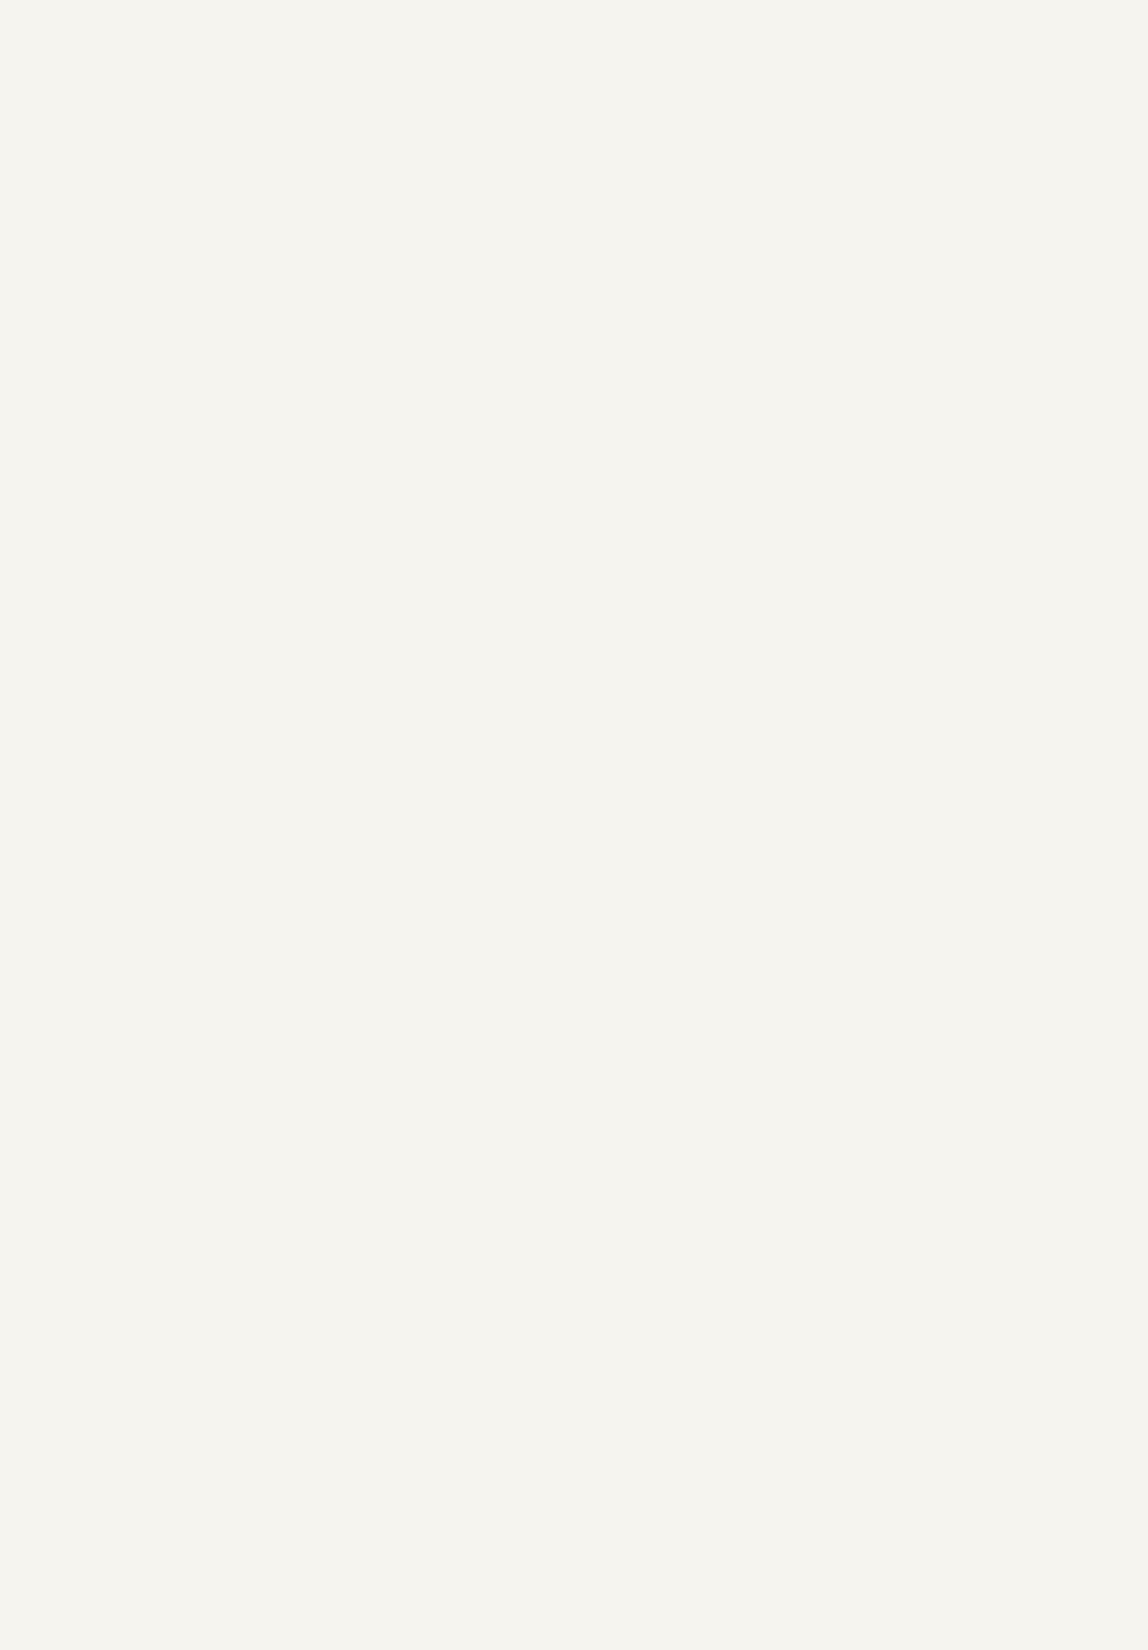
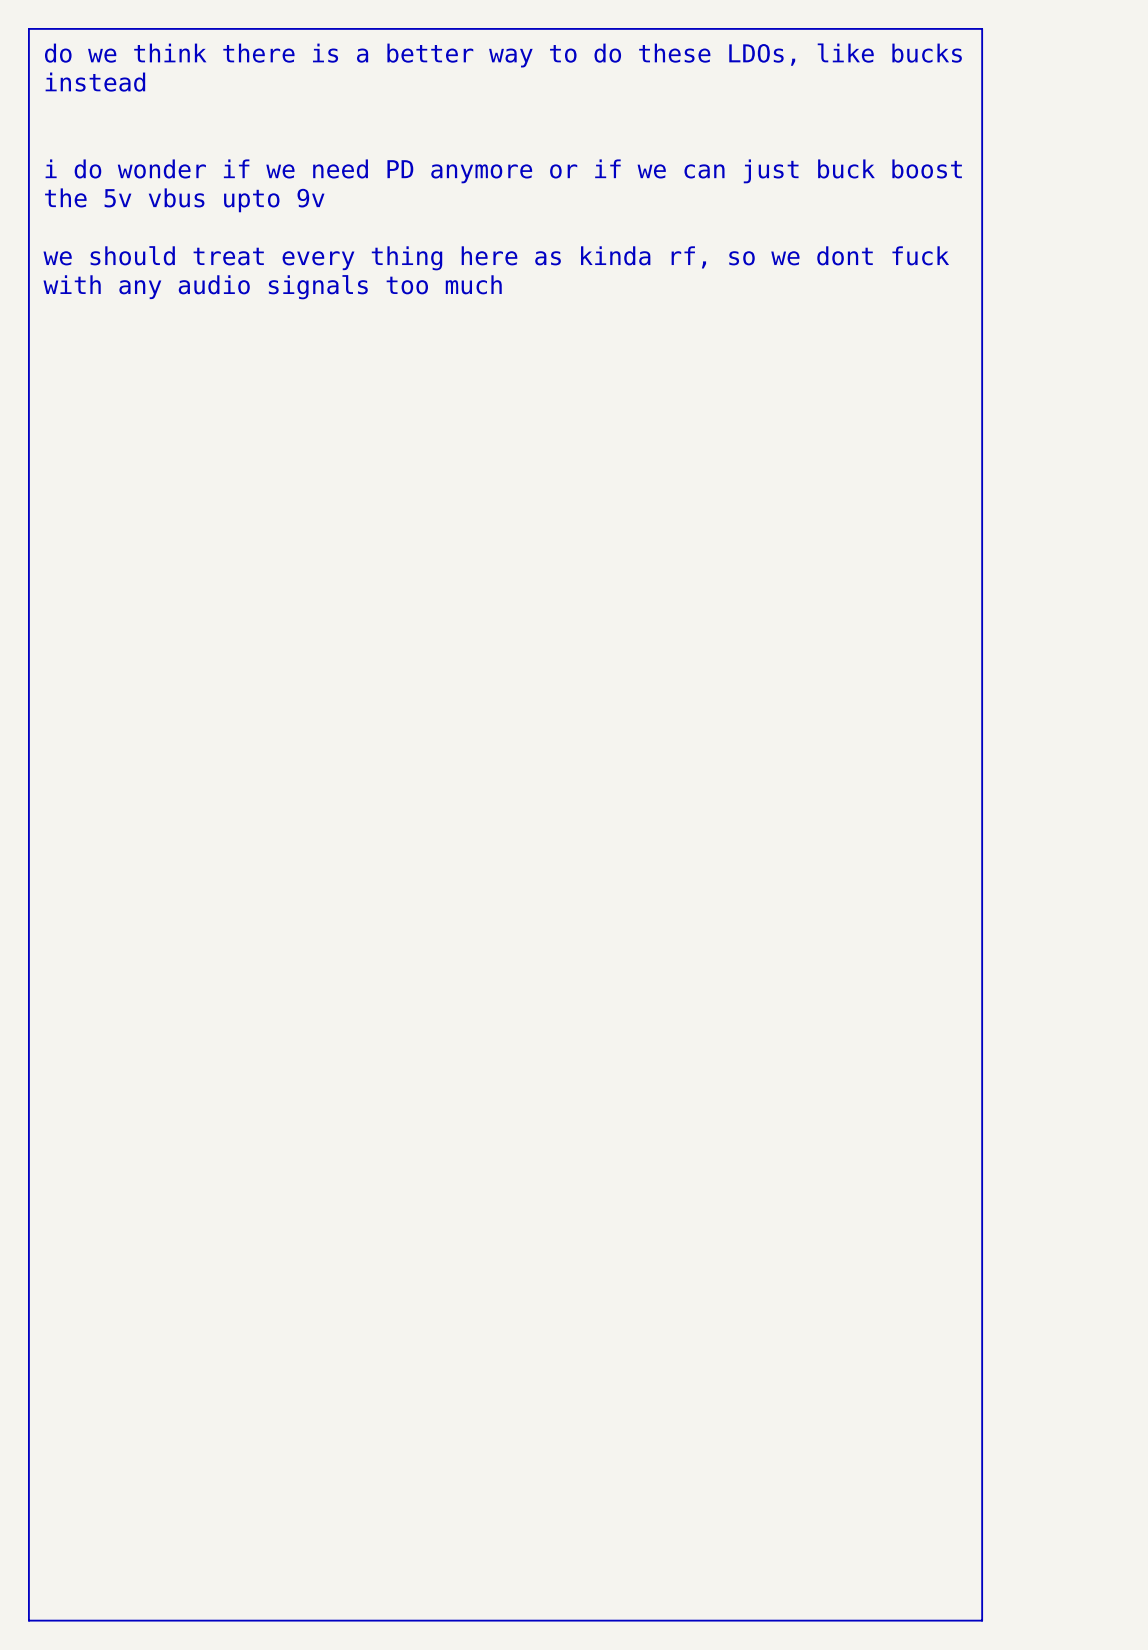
line: none -> (28, 28) (982, 28) (982, 1620) (28, 1620) (28, 28)
text: none -> do we think there is a better way to do these LDOs, like bucks (503, 55)
text: none -> instead (95, 82)
text: none -> i do wonder if we need PD anymore or if we can just buck boost (503, 171)
text: none -> the 5v vbus upto 9v (184, 200)
text: none -> we should treat every thing here as kinda rf, so we dont fuck (496, 258)
text: none -> with any audio signals too much (272, 287)

